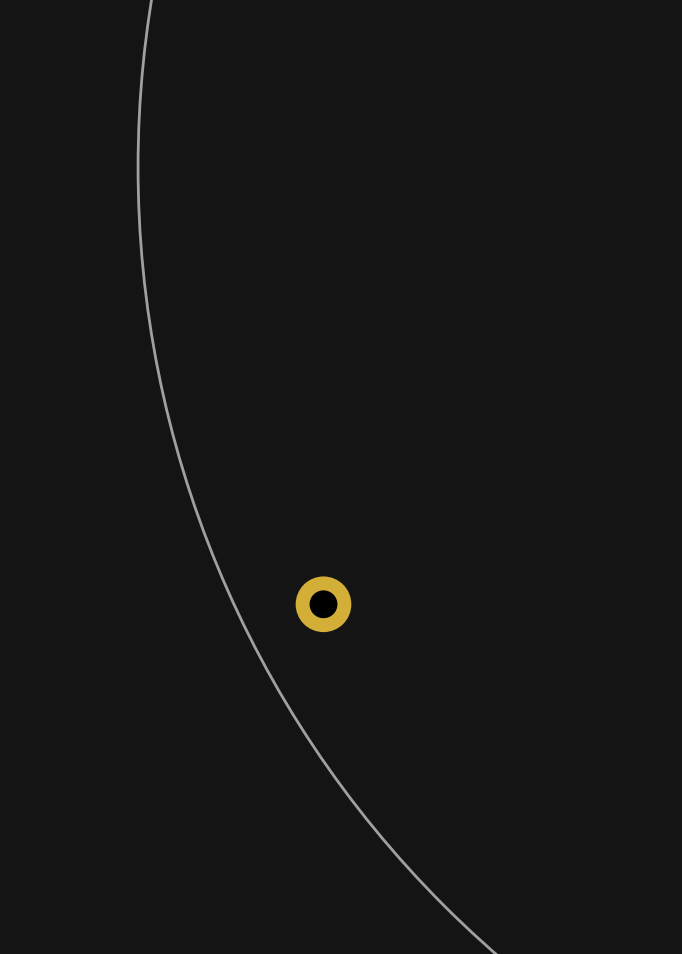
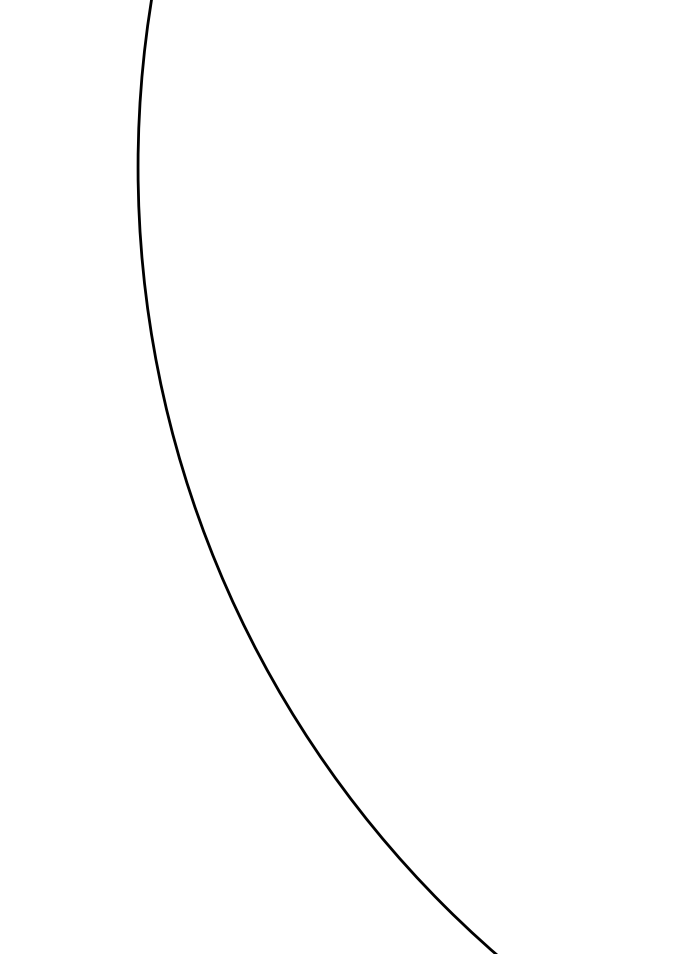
part: (323, 604) -> none

